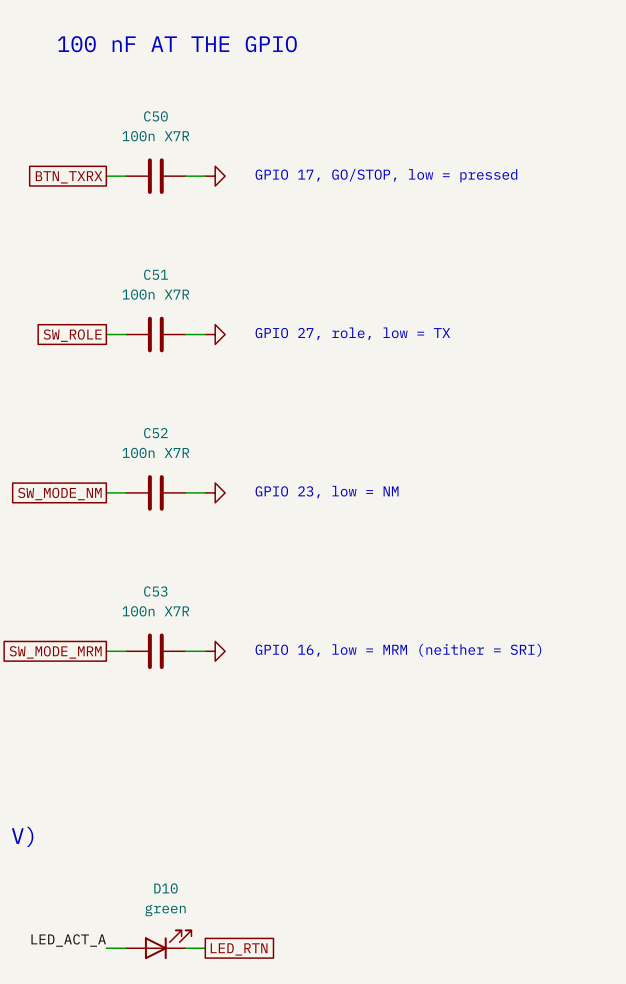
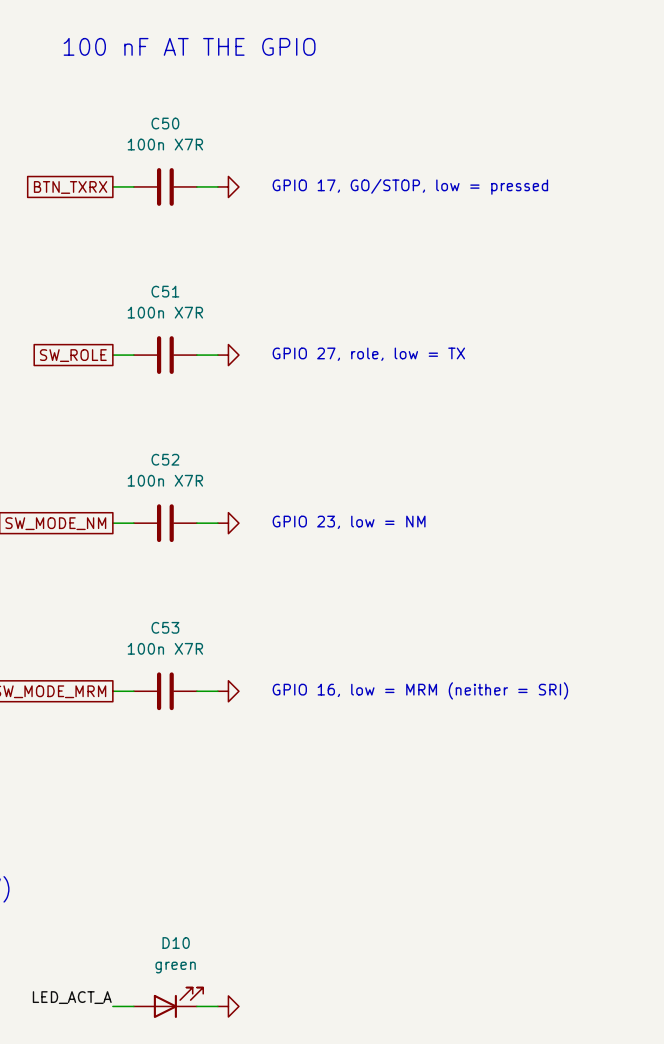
power symbol: none -> (228, 1006)
global label: LED_RTN (239, 949) -> none

